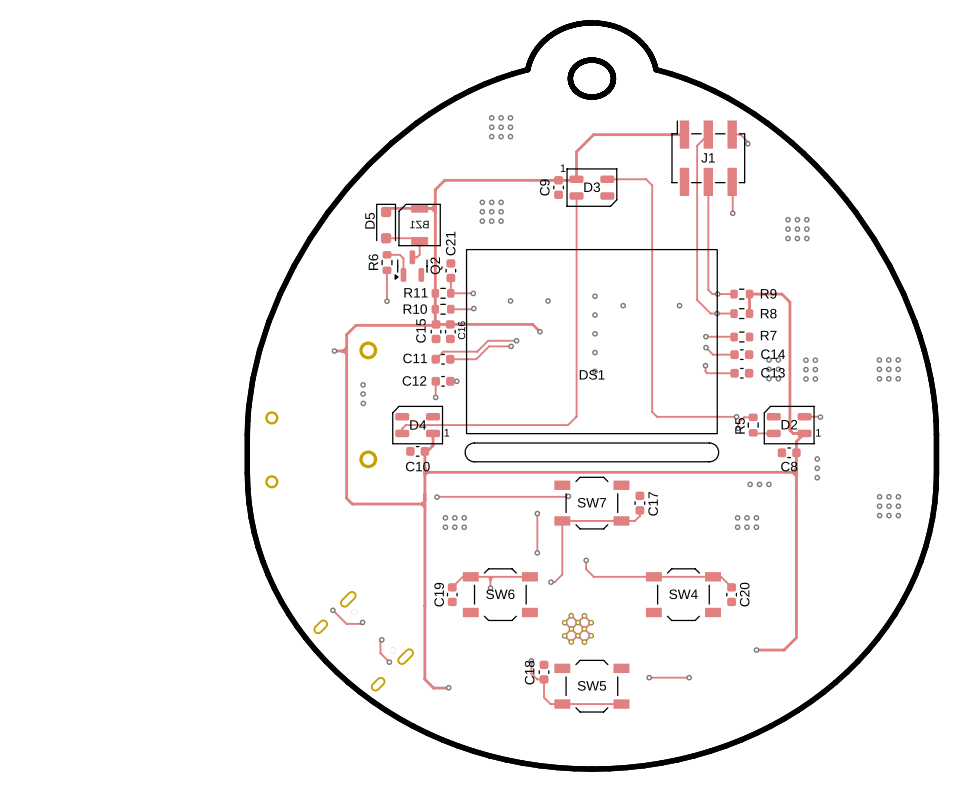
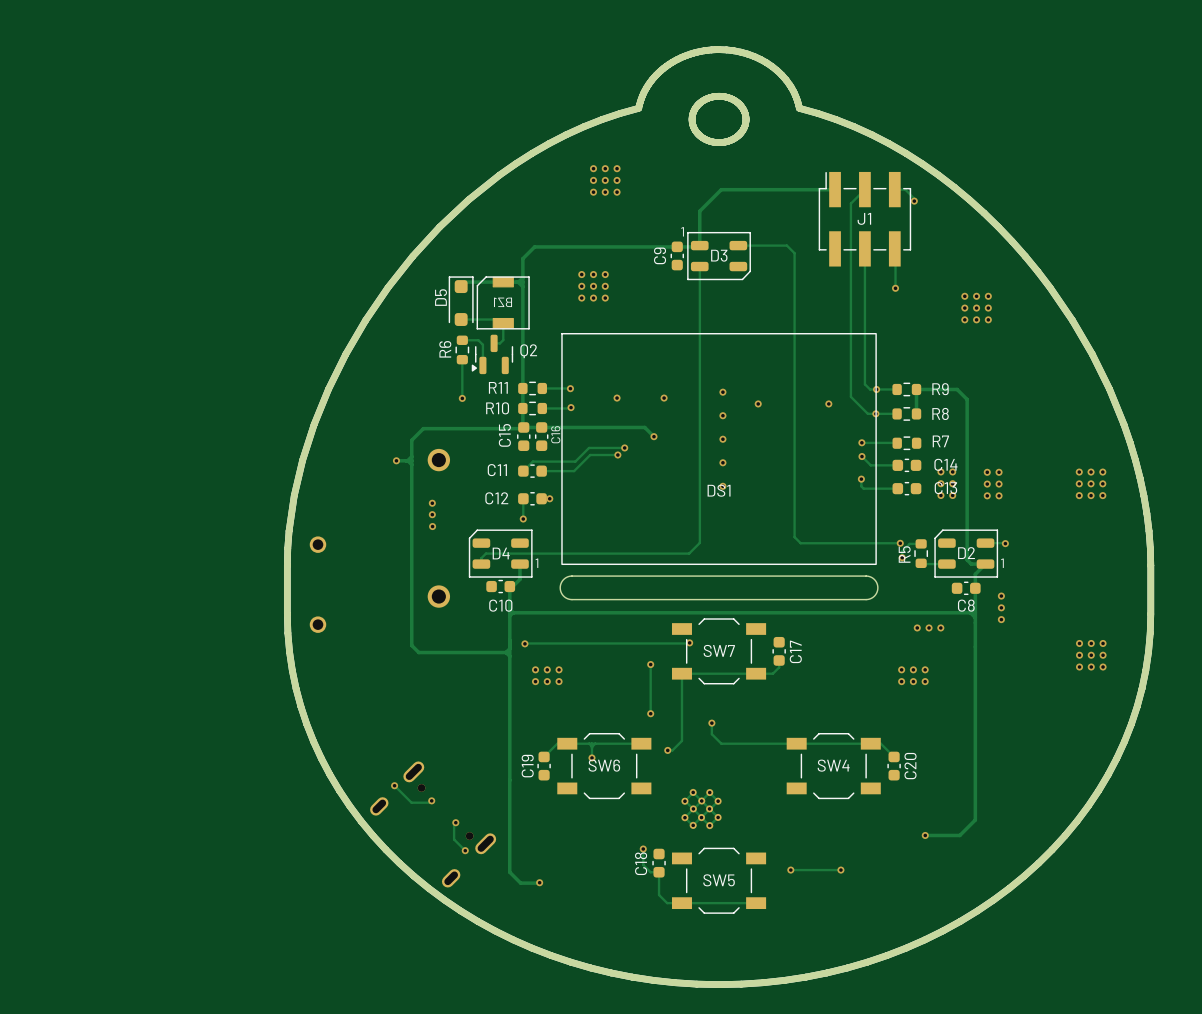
Q2 name rotation: 0° (436, 265) -> 90° clockwise (528, 351)
C21: (450, 270) -> none
track: (450, 277) (450, 293) -> none

